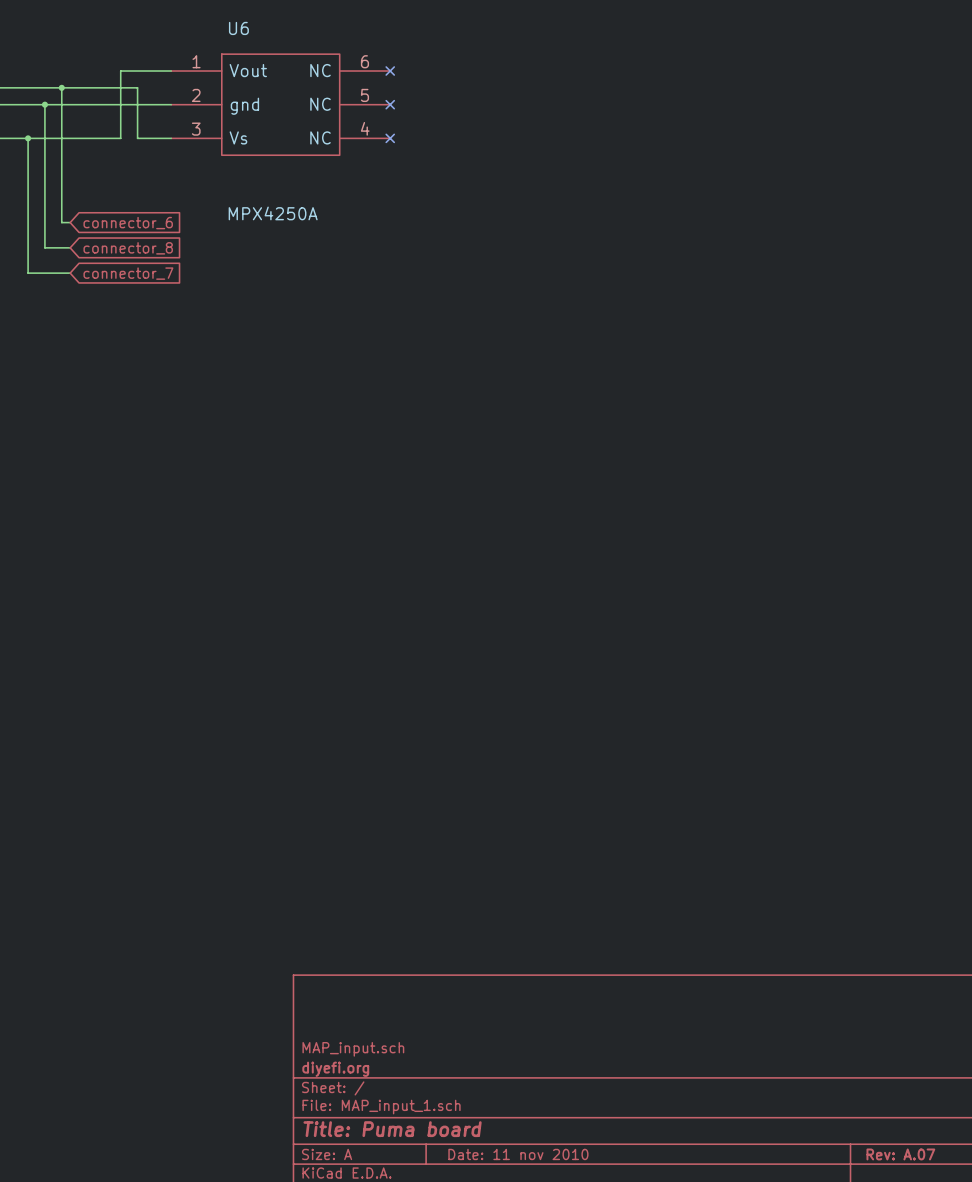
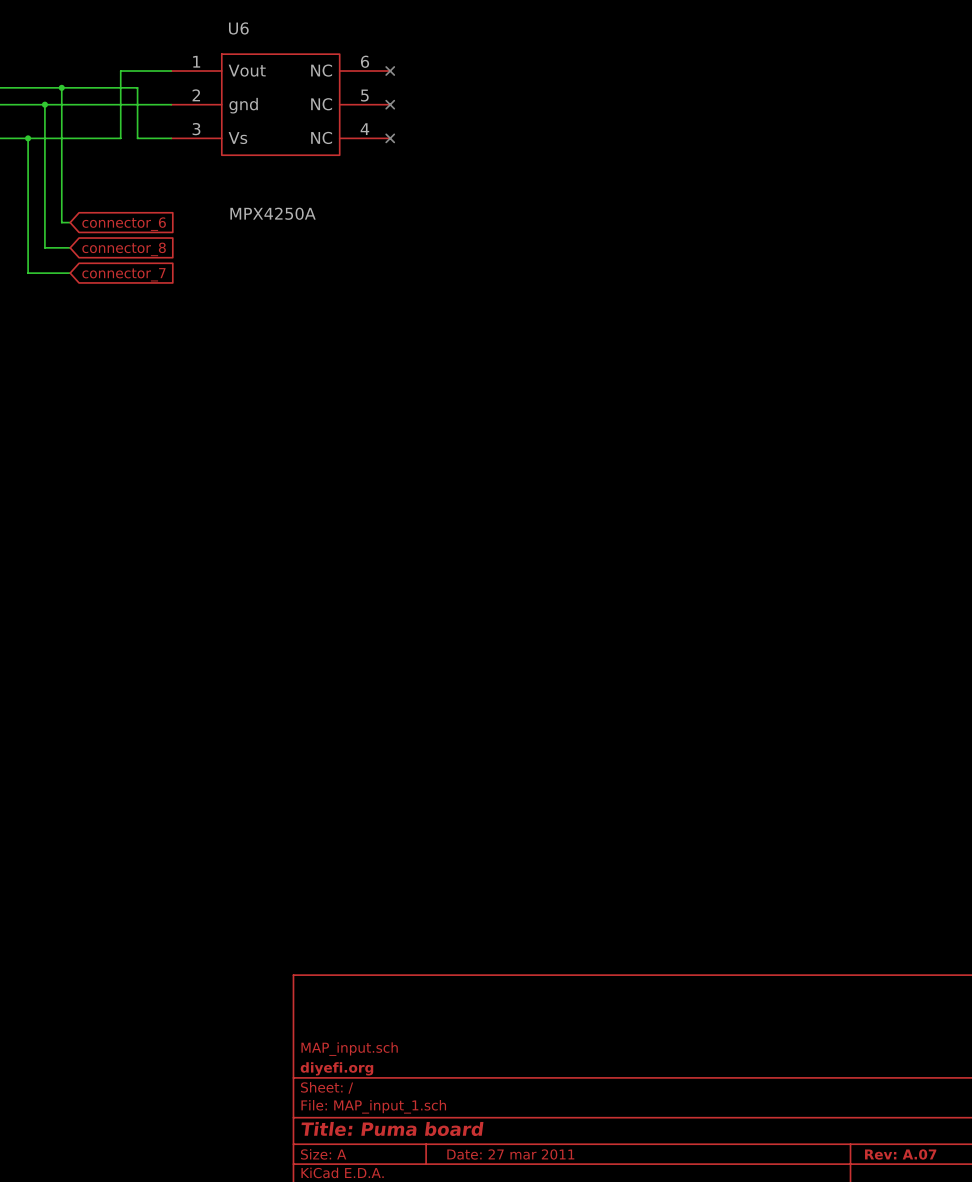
title block: Date: 11 nov 2010 (518, 1154) -> Date: 27 mar 2011 (510, 1154)

